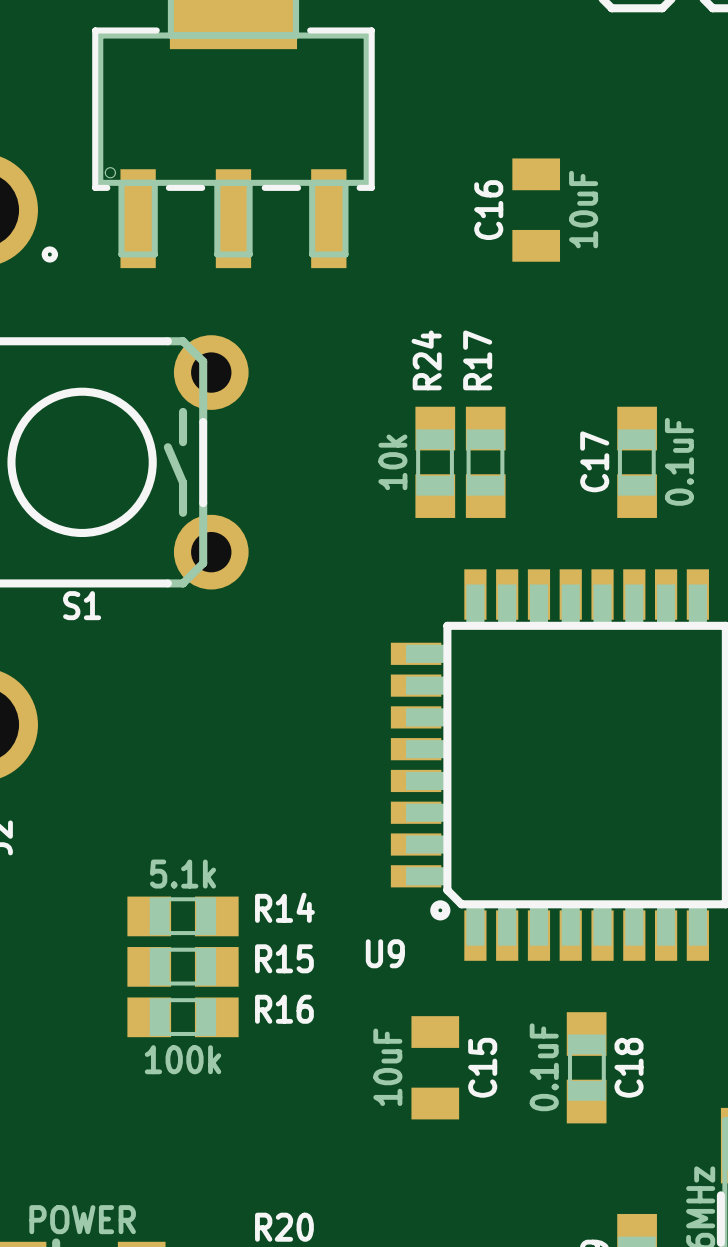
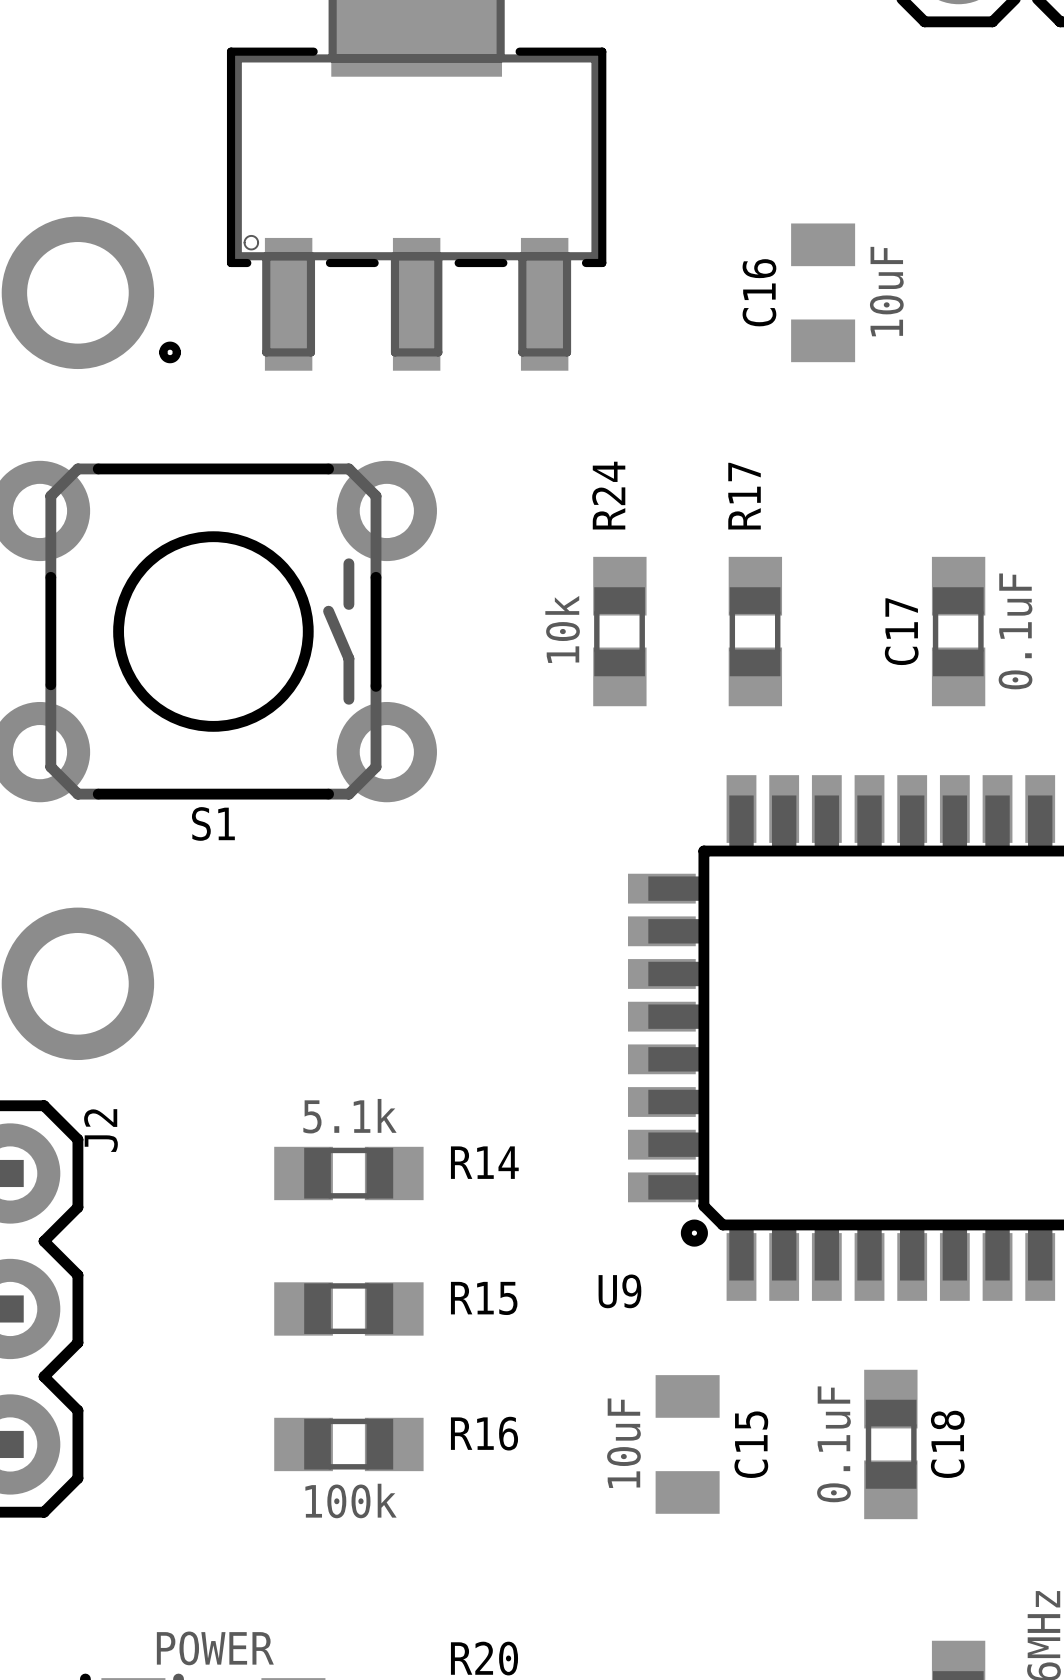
R24 position: (435, 462) -> (619, 631)
R14 position: (183, 916) -> (348, 1173)
R16 position: (183, 1017) -> (348, 1444)

